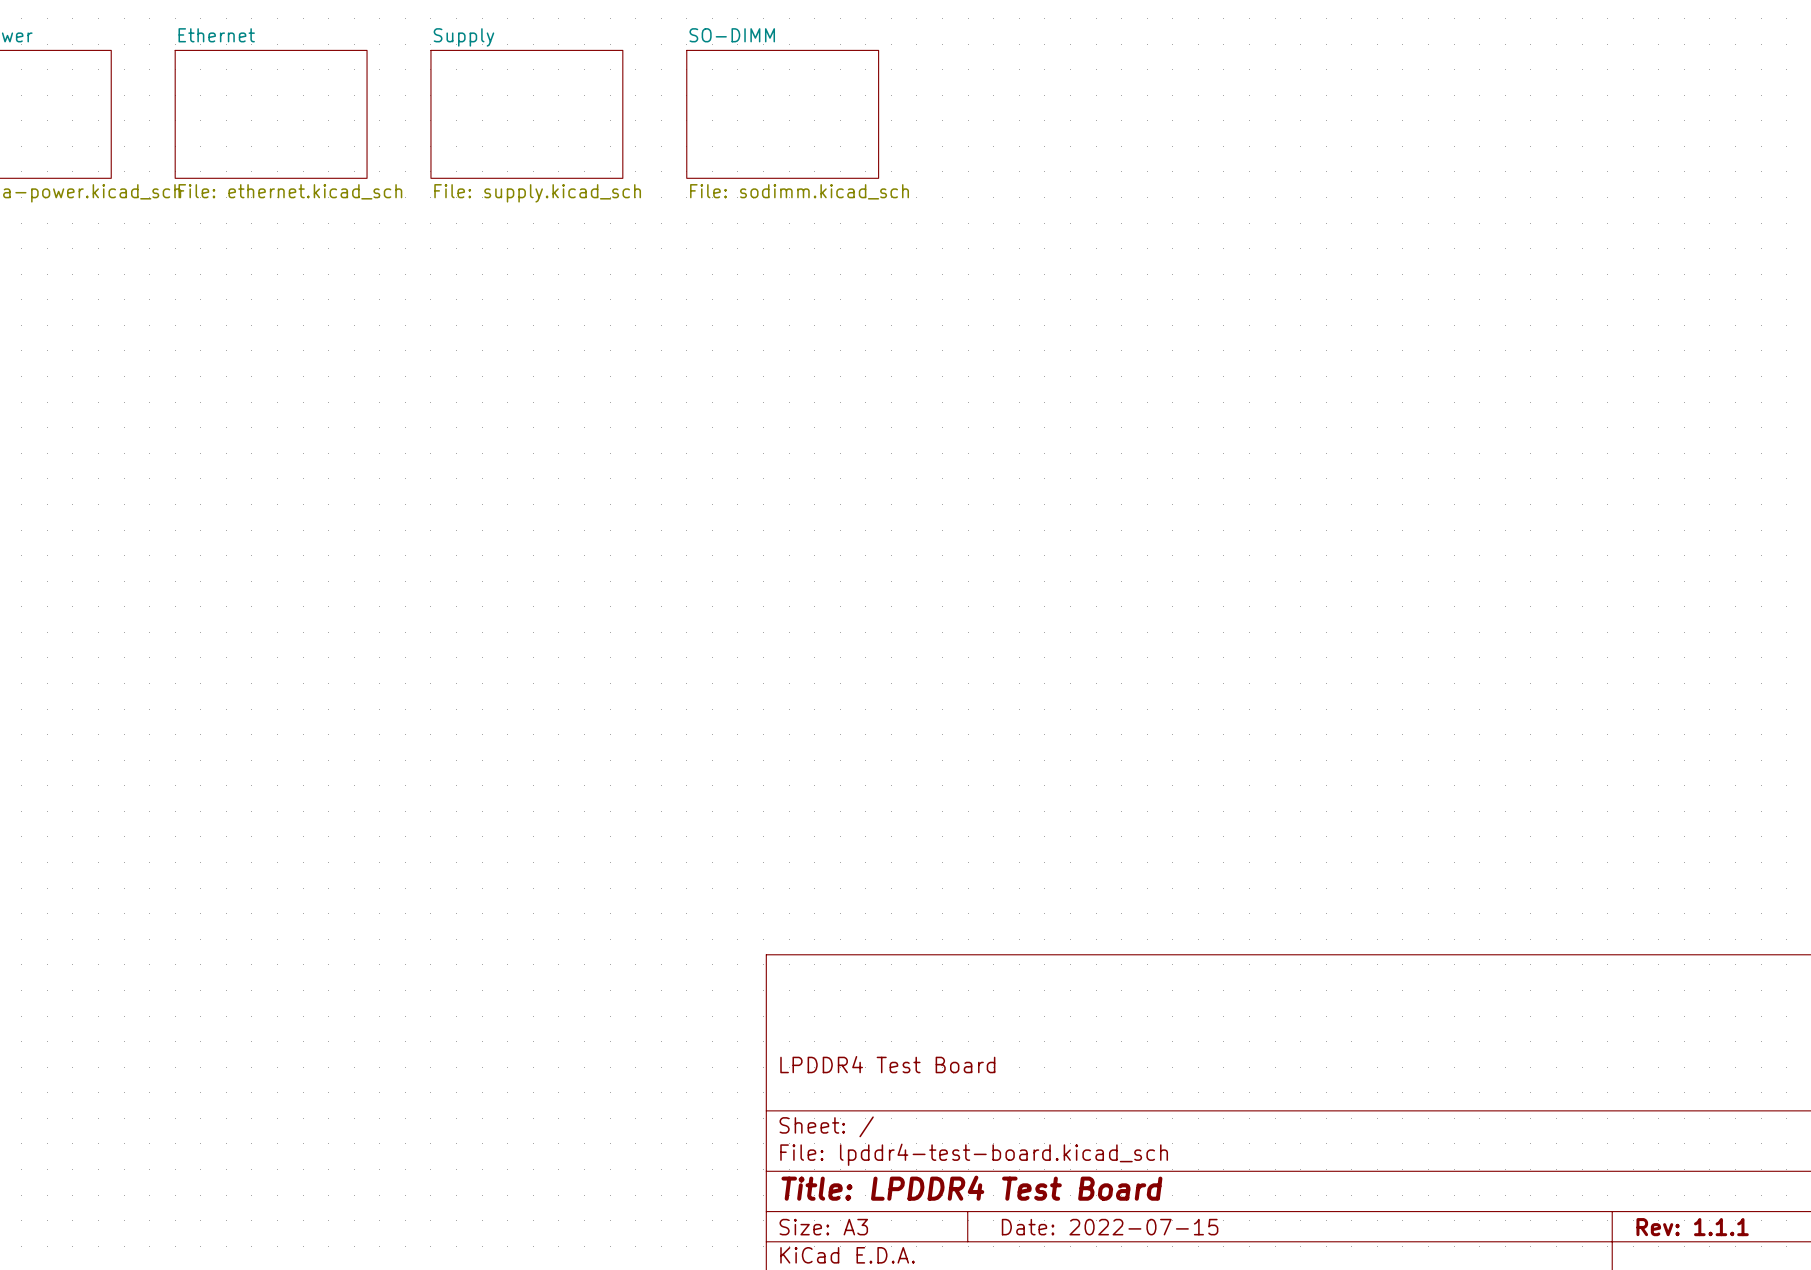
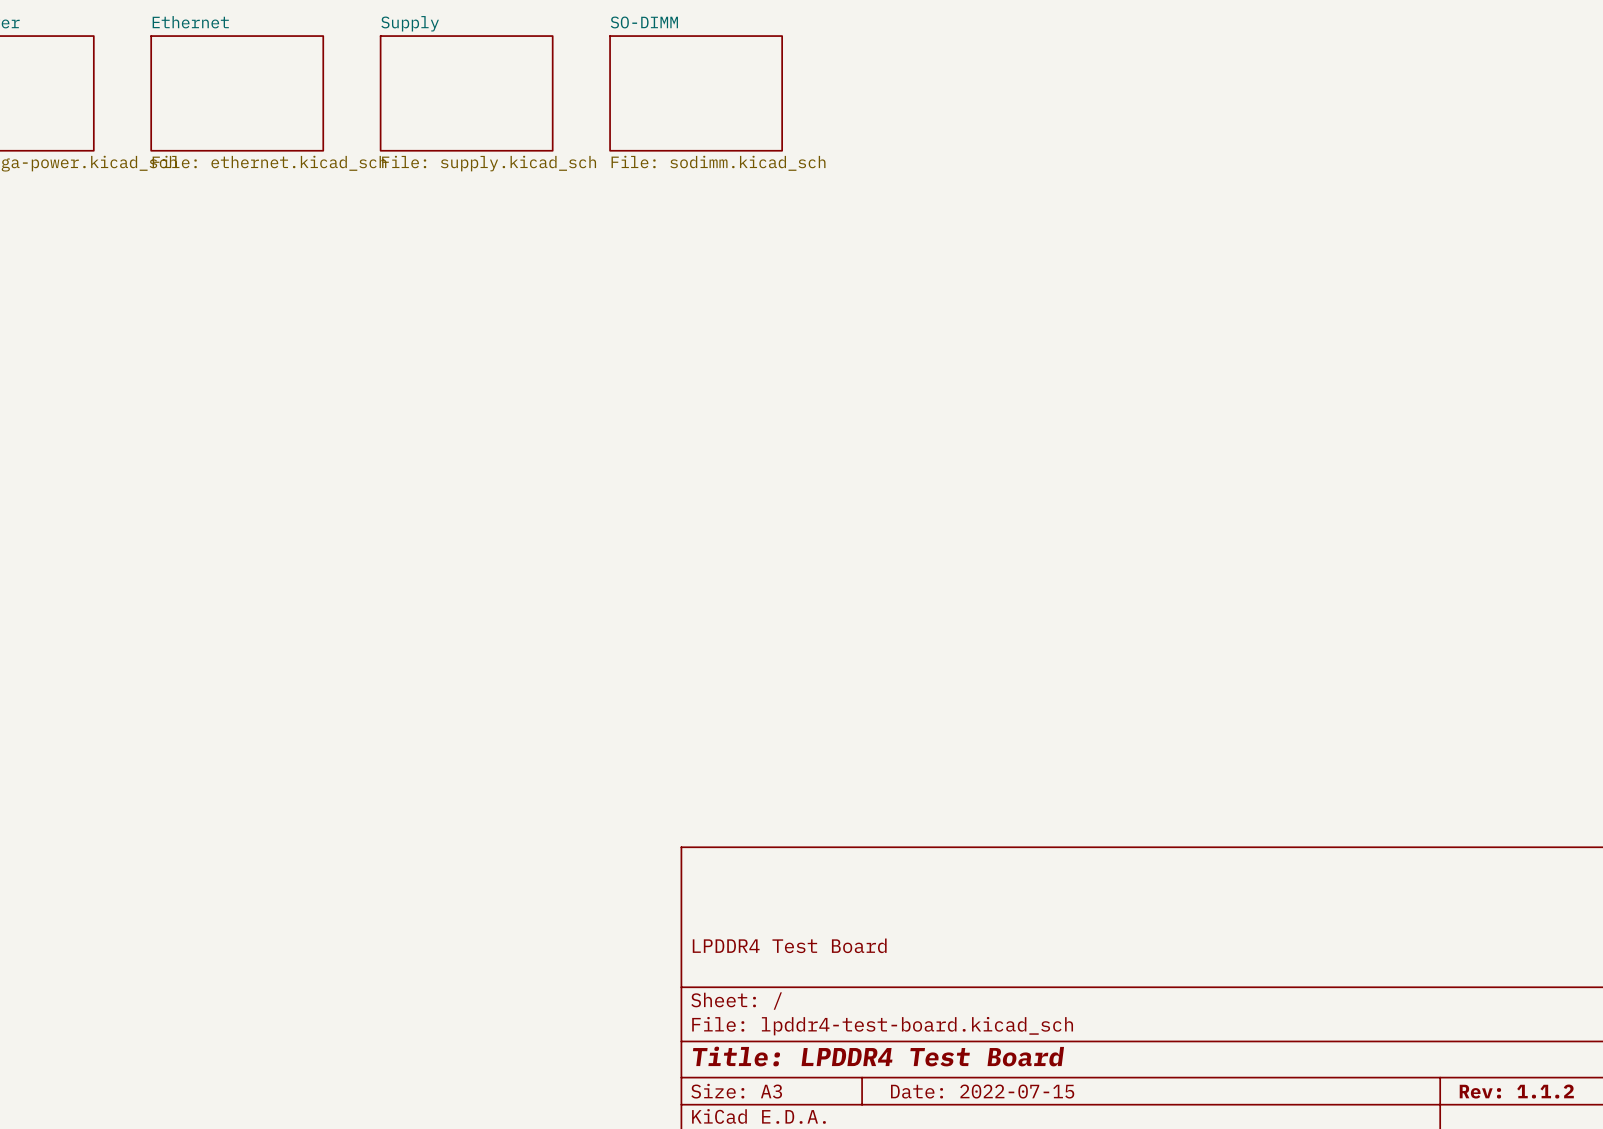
title block: Rev: 1.1.1 (1692, 1227) -> Rev: 1.1.2 (1516, 1091)

